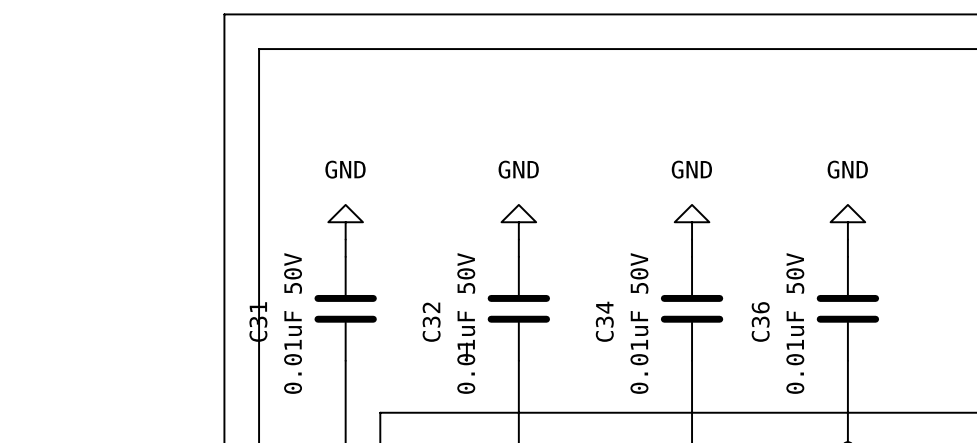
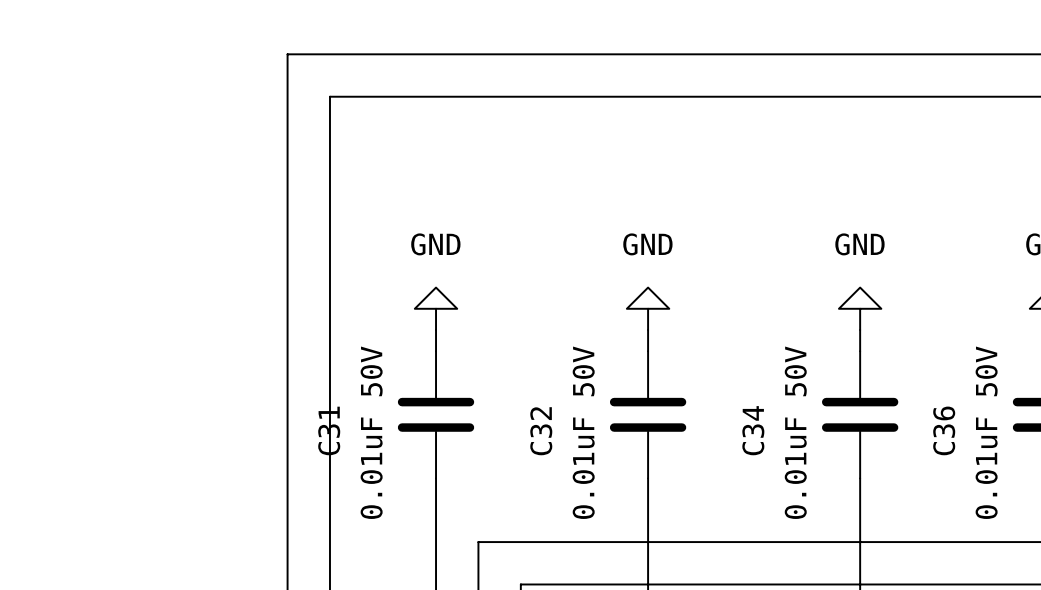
wire: (466, 343) (466, 360) -> none

